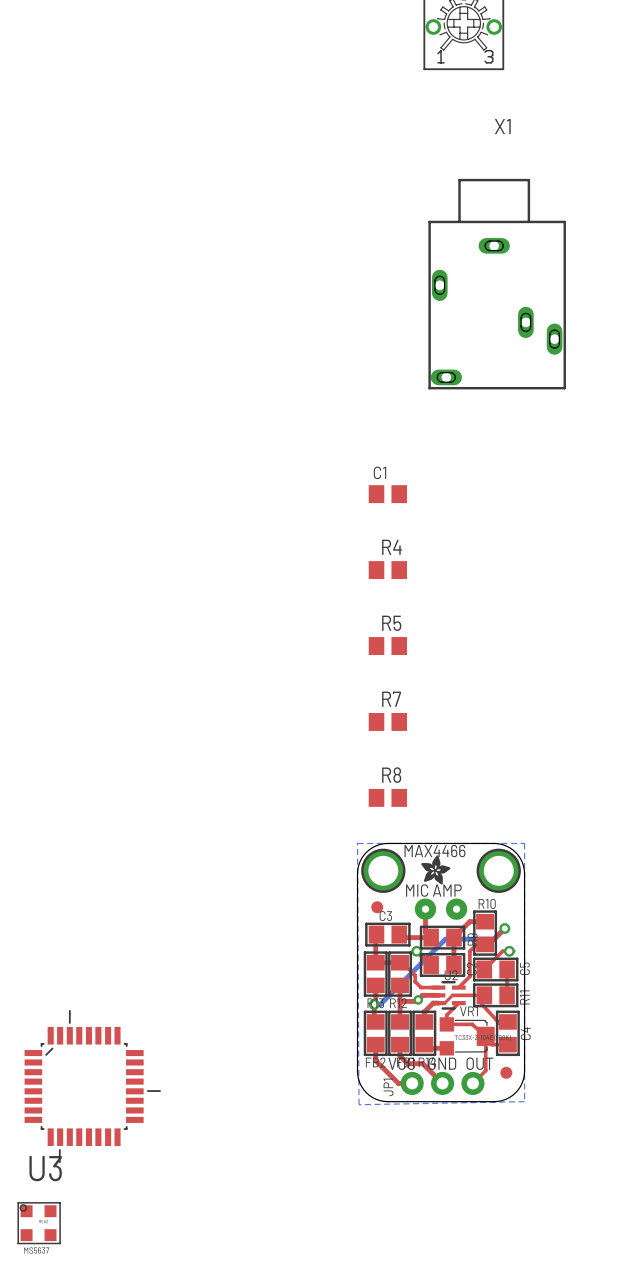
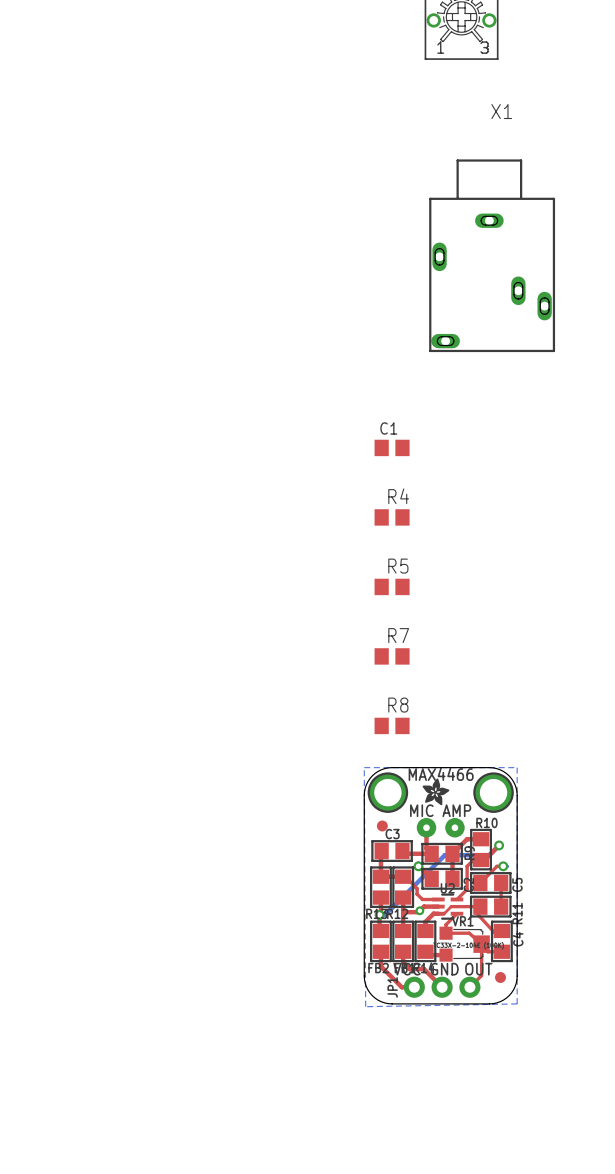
U3: (92, 1086) -> none
part: (39, 1223) -> none

